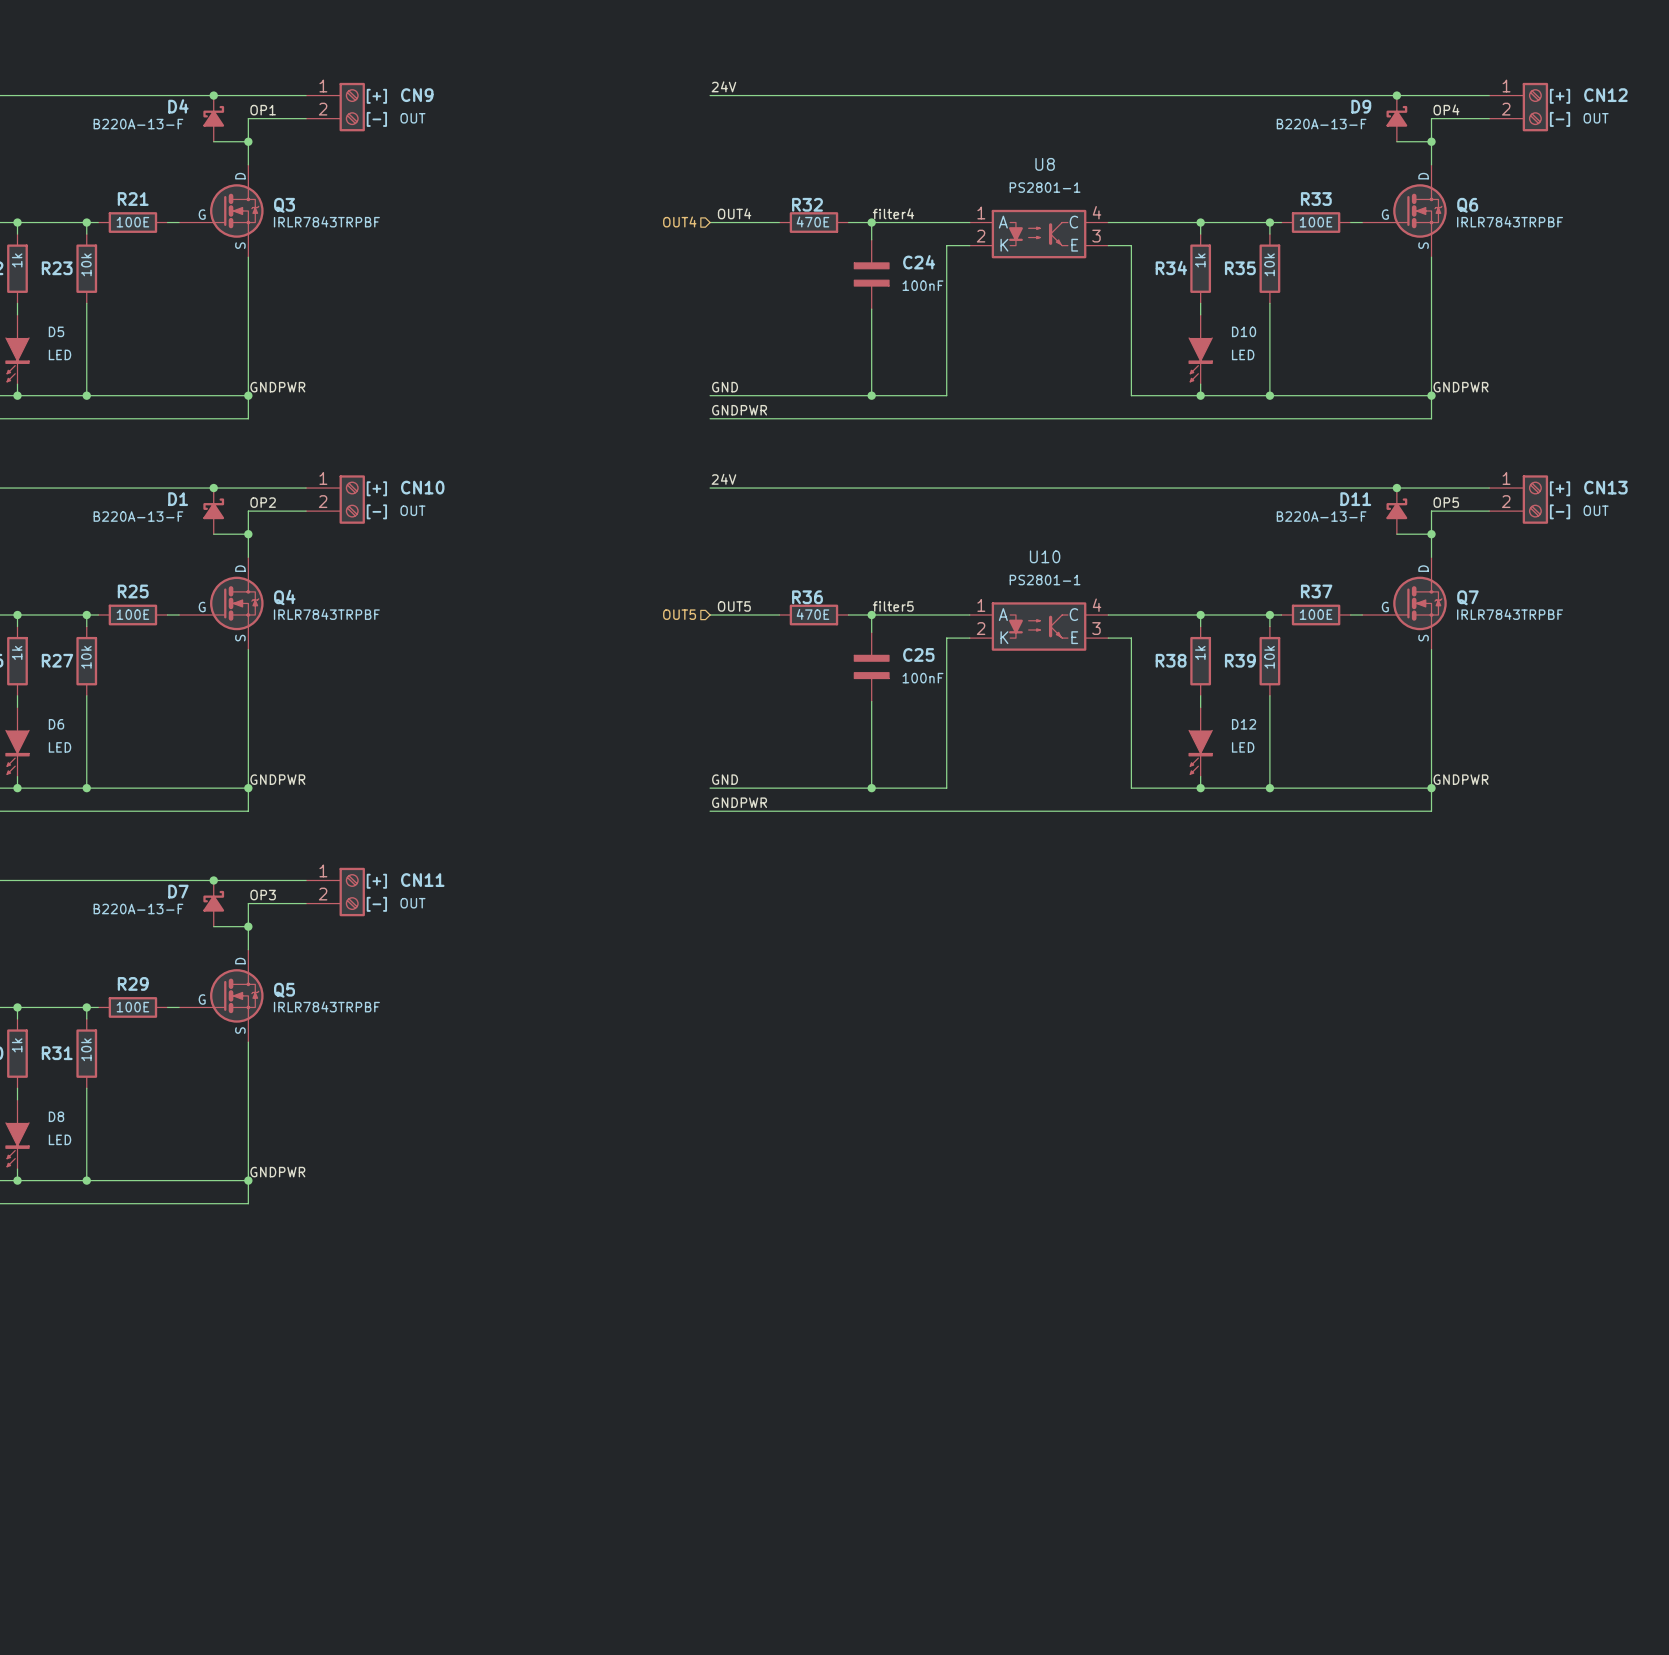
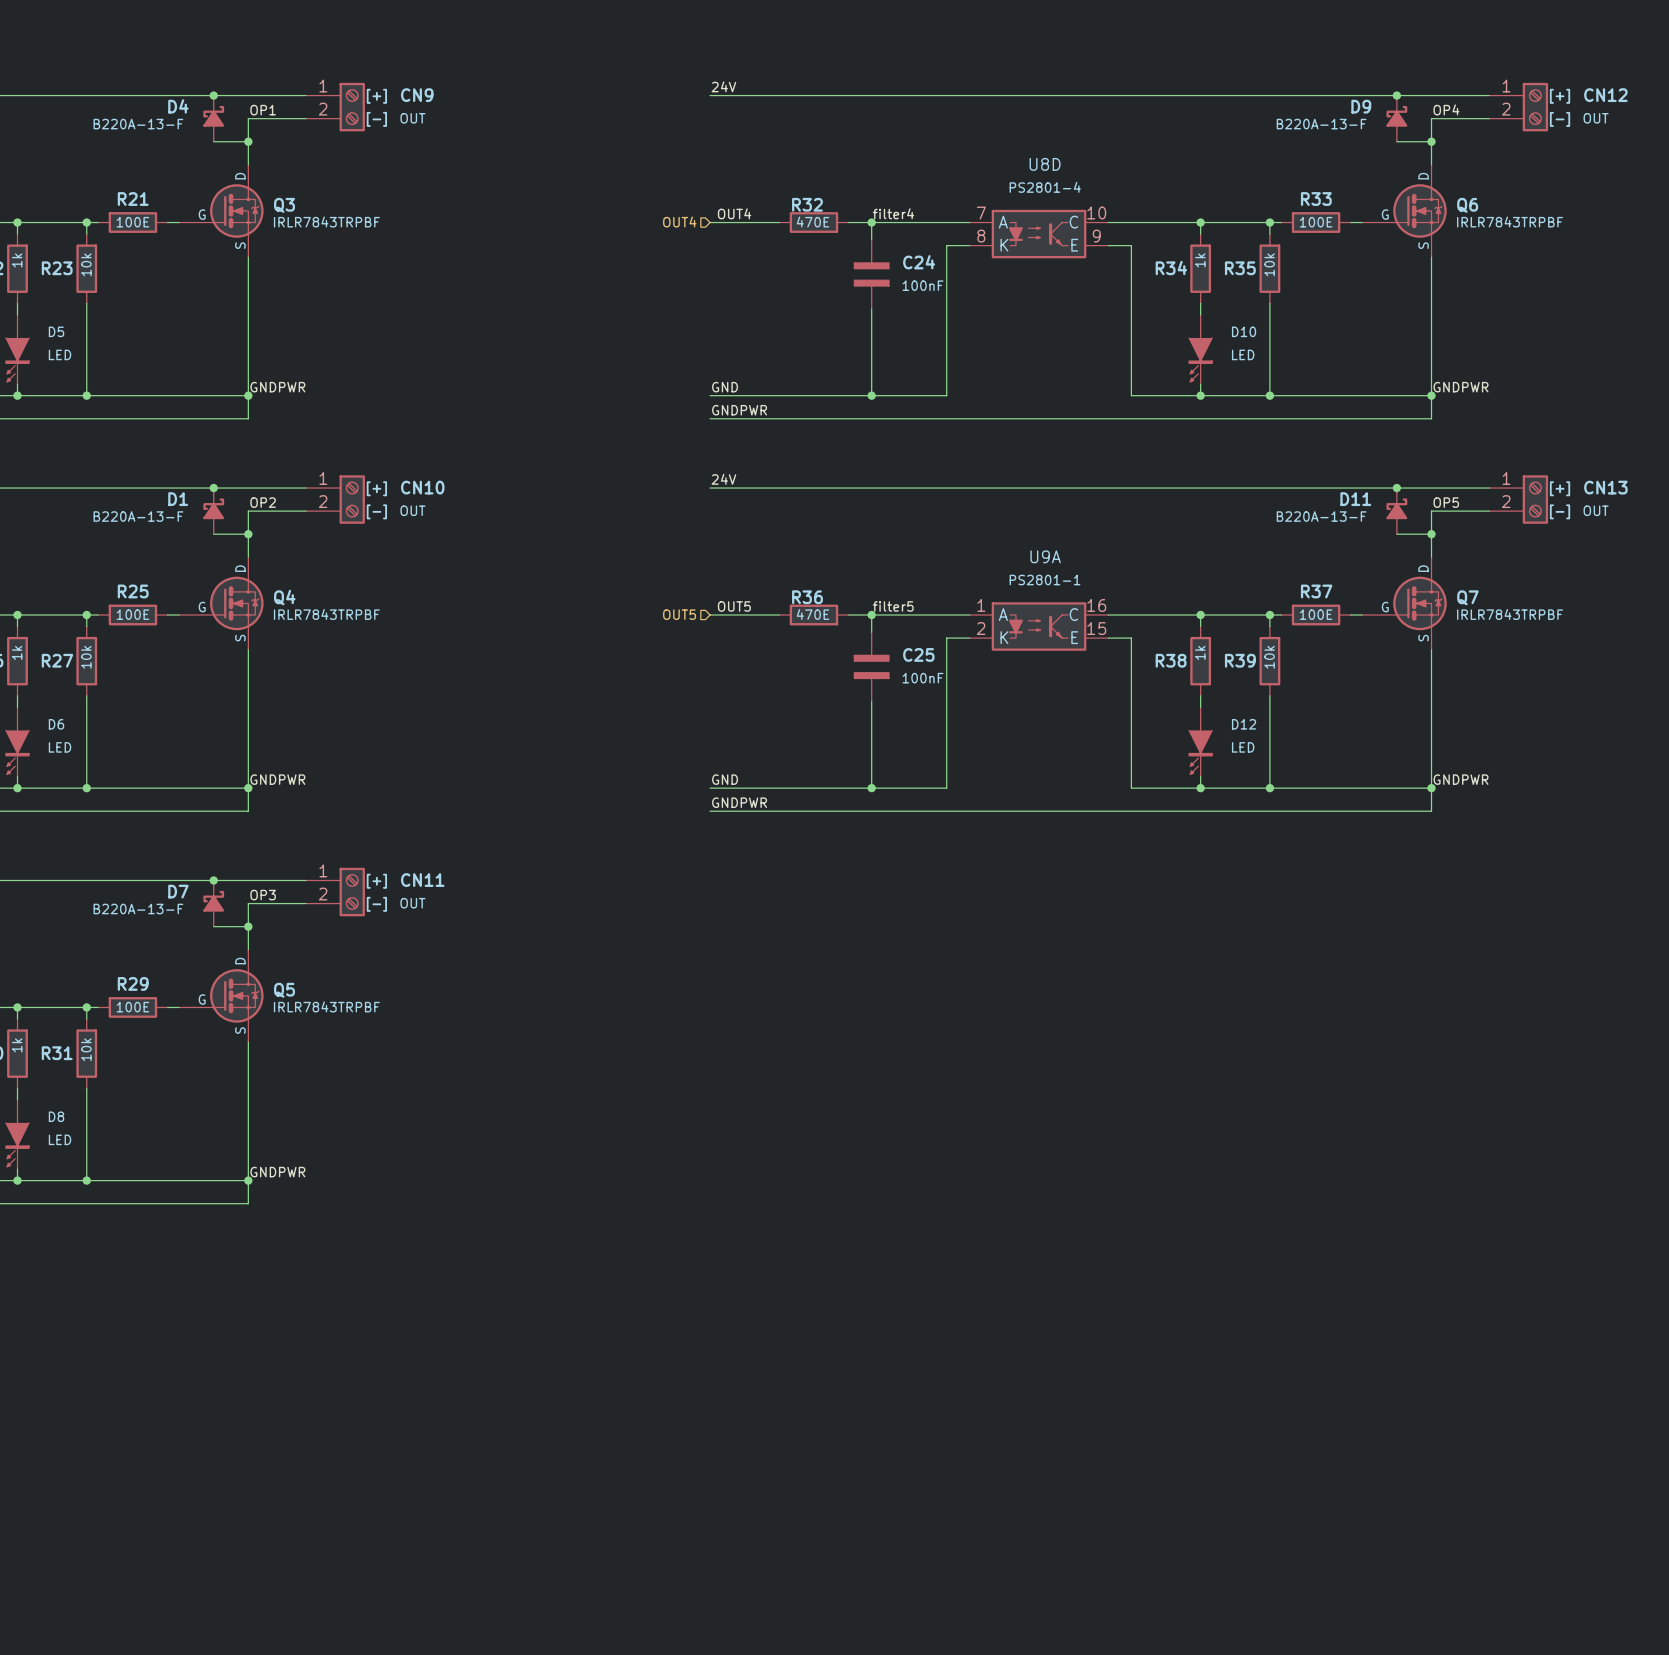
U8 name: U8 (1045, 164) -> U8D (1045, 164)
U8 value: PS2801-1 (1045, 187) -> PS2801-4 (1045, 187)
U8 pin number: 4 (1097, 212) -> 10 (1096, 213)
U8 pin number: 1 (981, 213) -> 7 (981, 213)
U8 pin number: 2 (981, 236) -> 8 (981, 236)
U8 pin number: 3 (1096, 236) -> 9 (1096, 236)
U10 name: U10 (1045, 556) -> U9A (1045, 556)
U10 pin number: 4 (1097, 605) -> 16 (1096, 605)
U10 pin number: 3 (1096, 628) -> 15 (1096, 628)

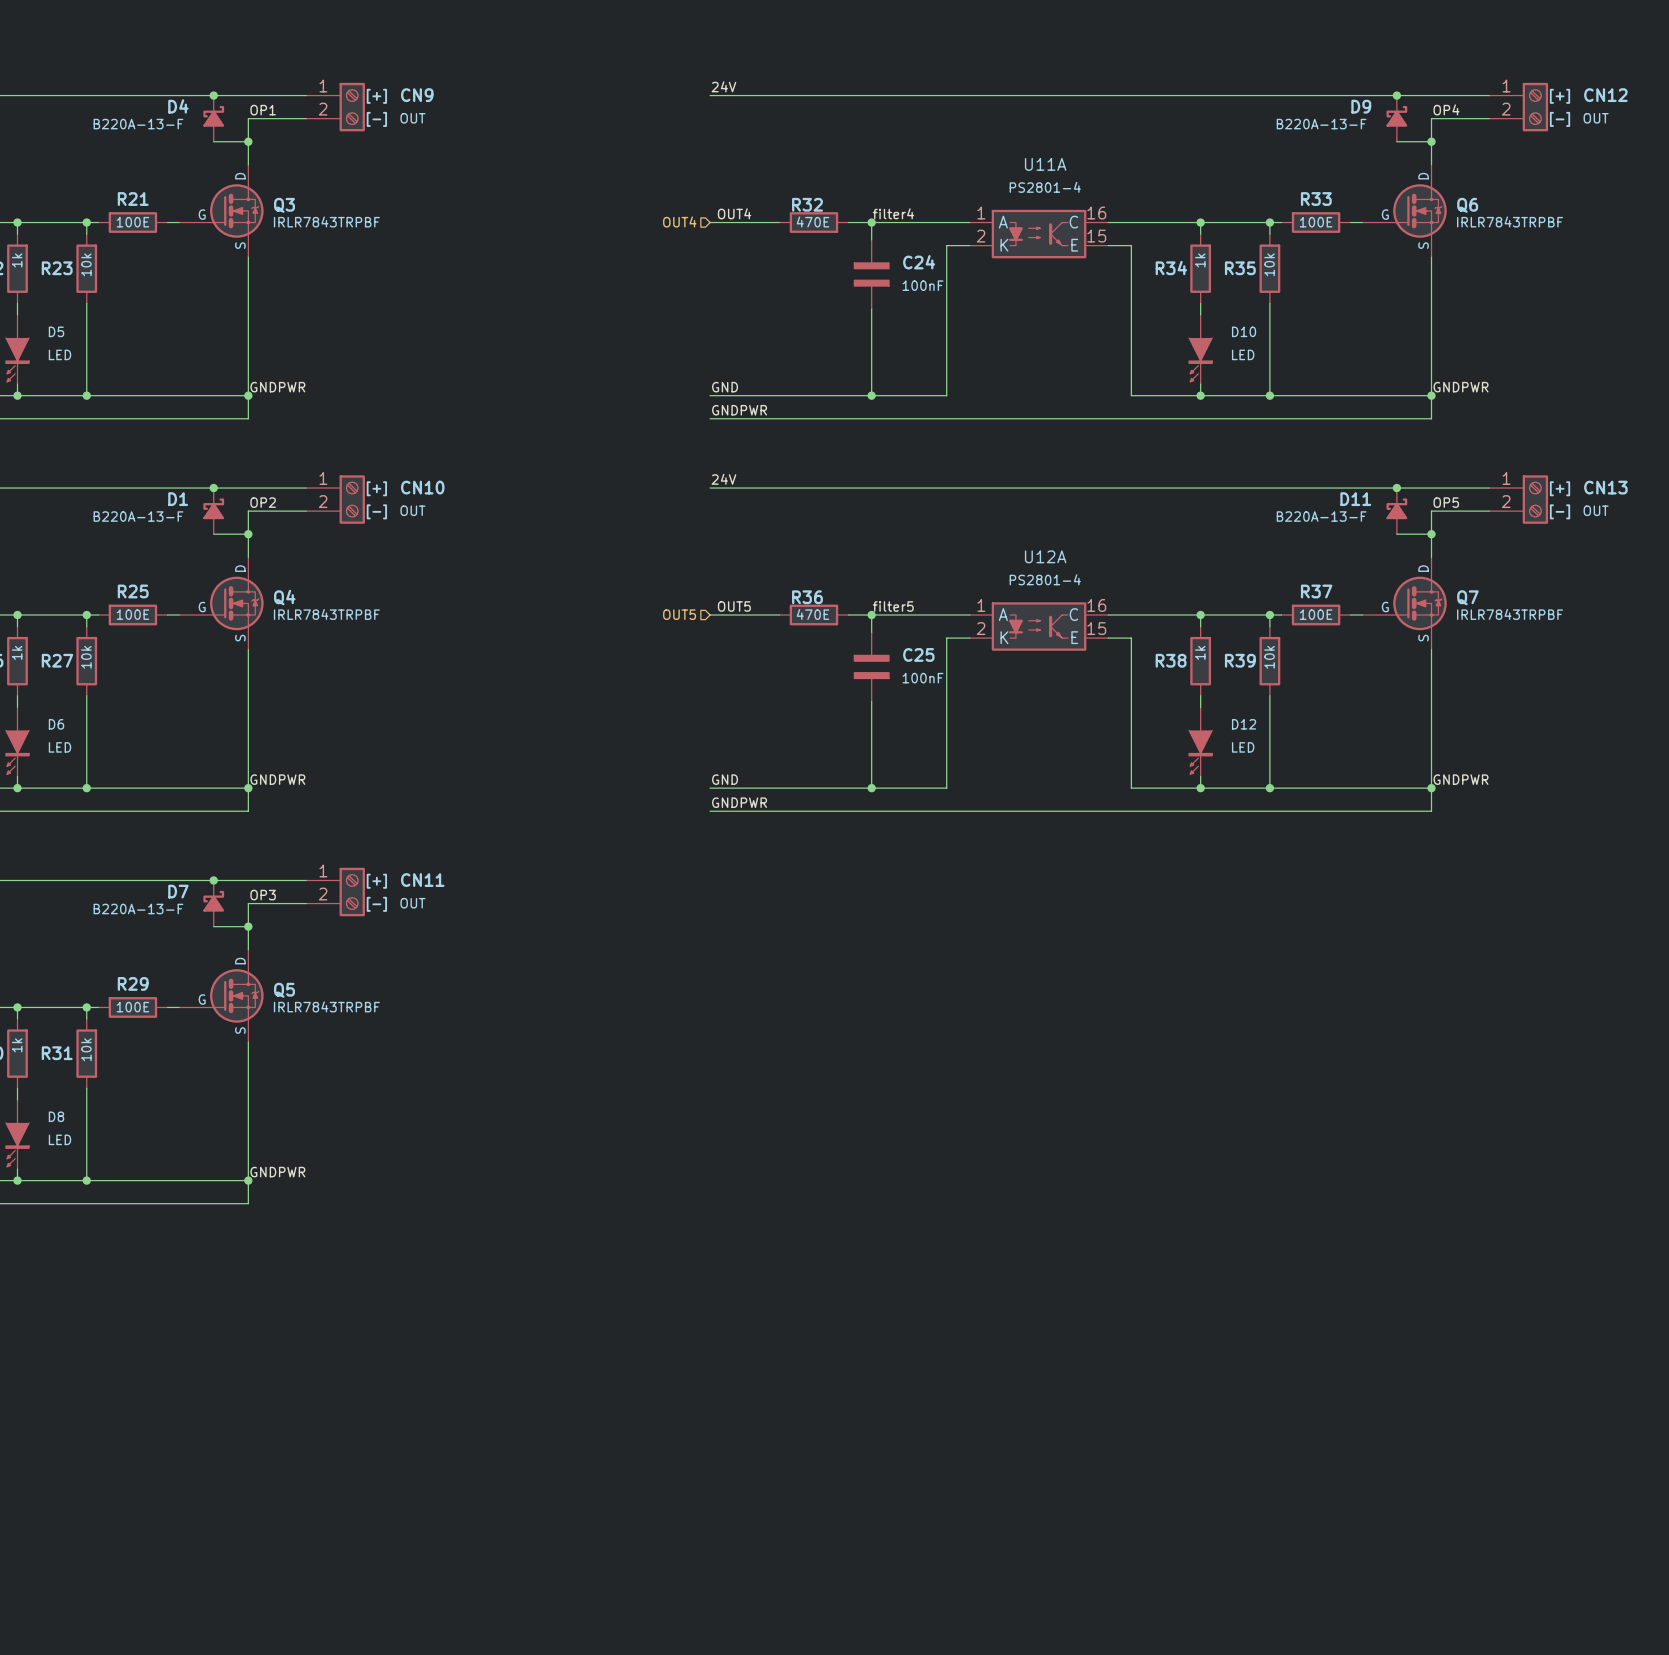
U8D name: U8D (1045, 164) -> U11A (1045, 164)
U8D pin number: 7 (981, 213) -> 1 (981, 213)
U8D pin number: 10 (1096, 213) -> 16 (1096, 213)
U8D pin number: 8 (981, 236) -> 2 (981, 236)
U8D pin number: 9 (1096, 236) -> 15 (1096, 236)
U9A name: U9A (1045, 556) -> U12A (1045, 556)
U9A value: PS2801-1 (1045, 580) -> PS2801-4 (1045, 579)

